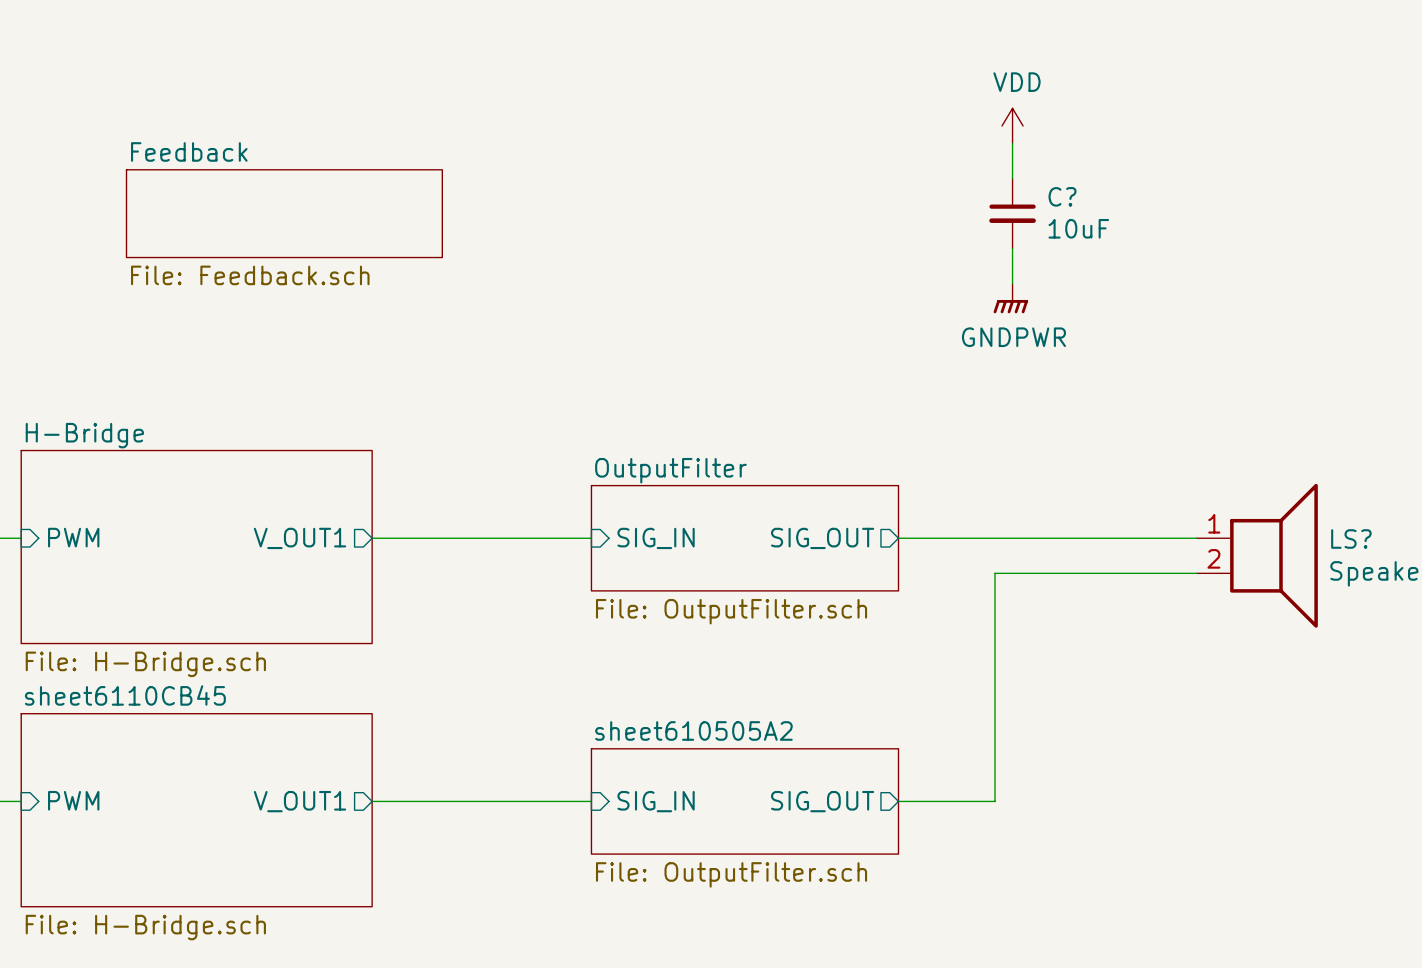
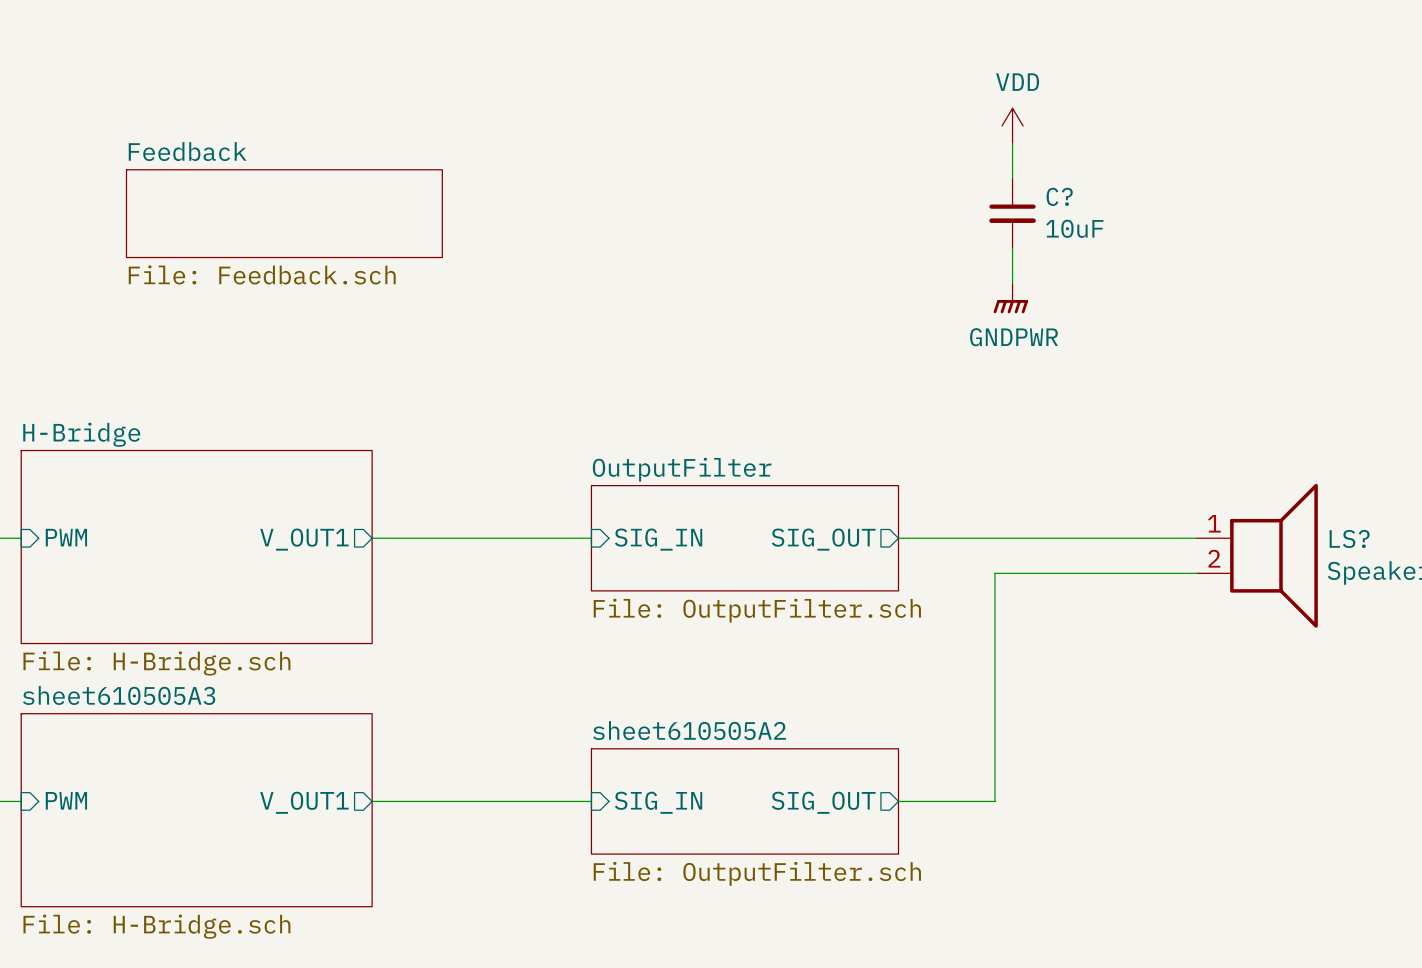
sheet sheet6110CB45 name: sheet6110CB45 (125, 695) -> sheet610505A3 (119, 695)

